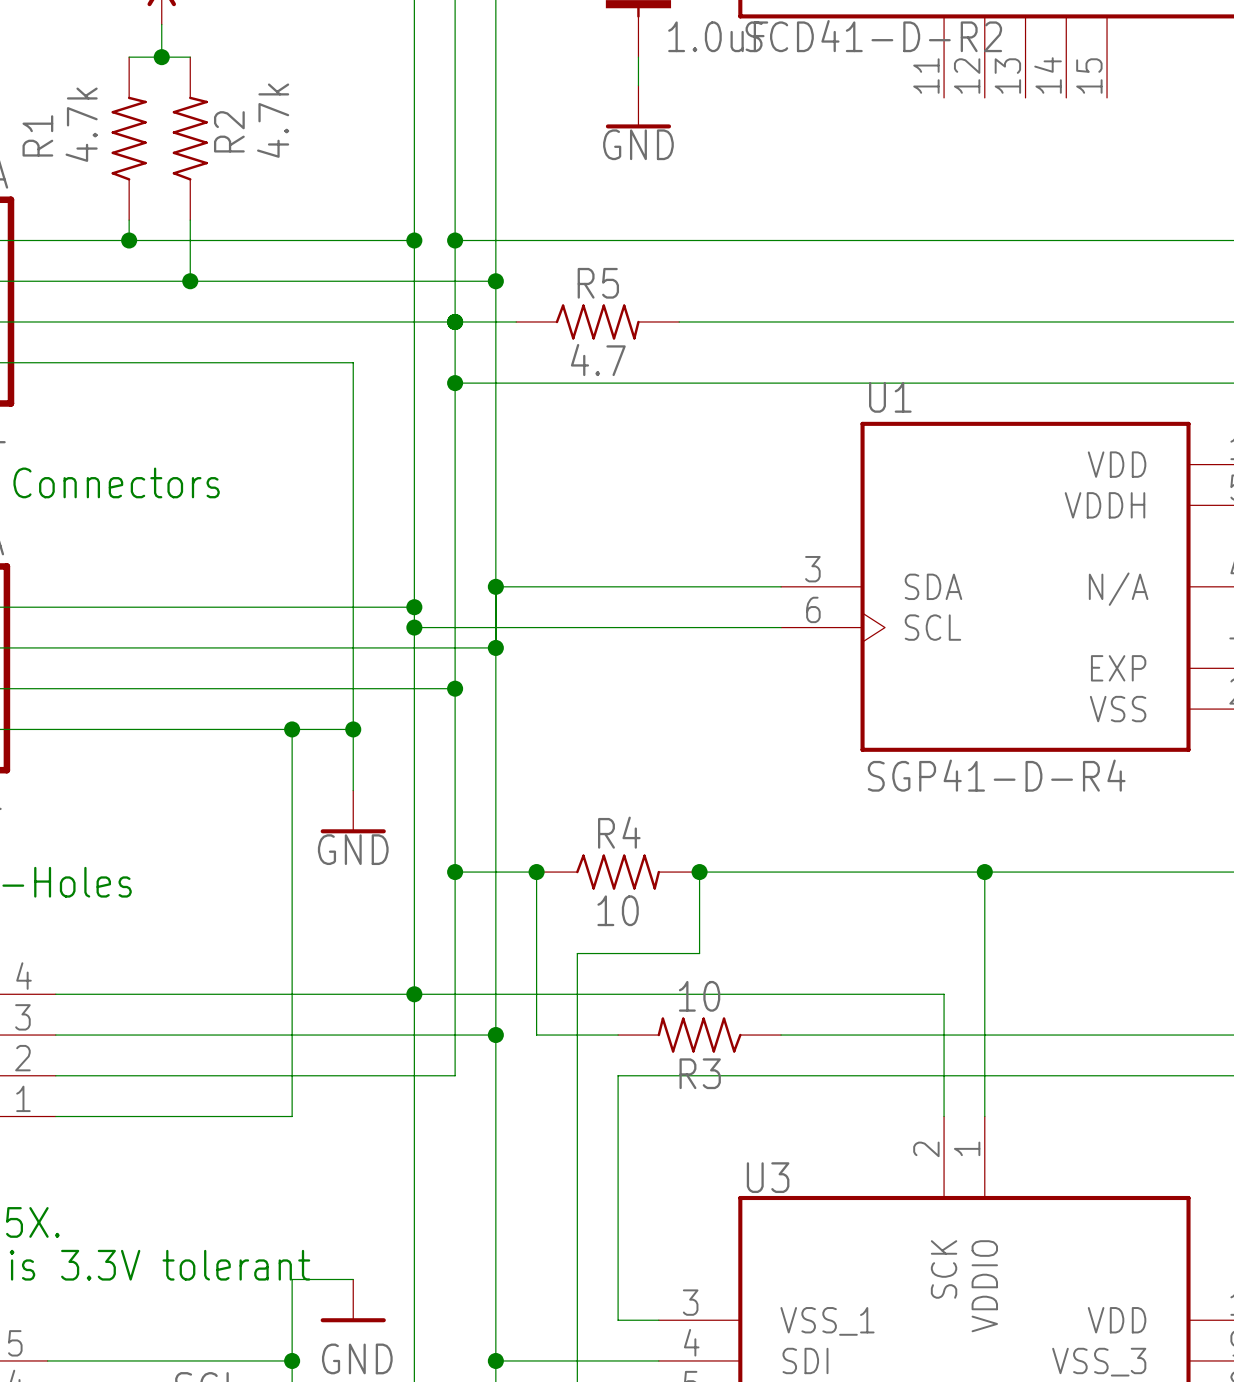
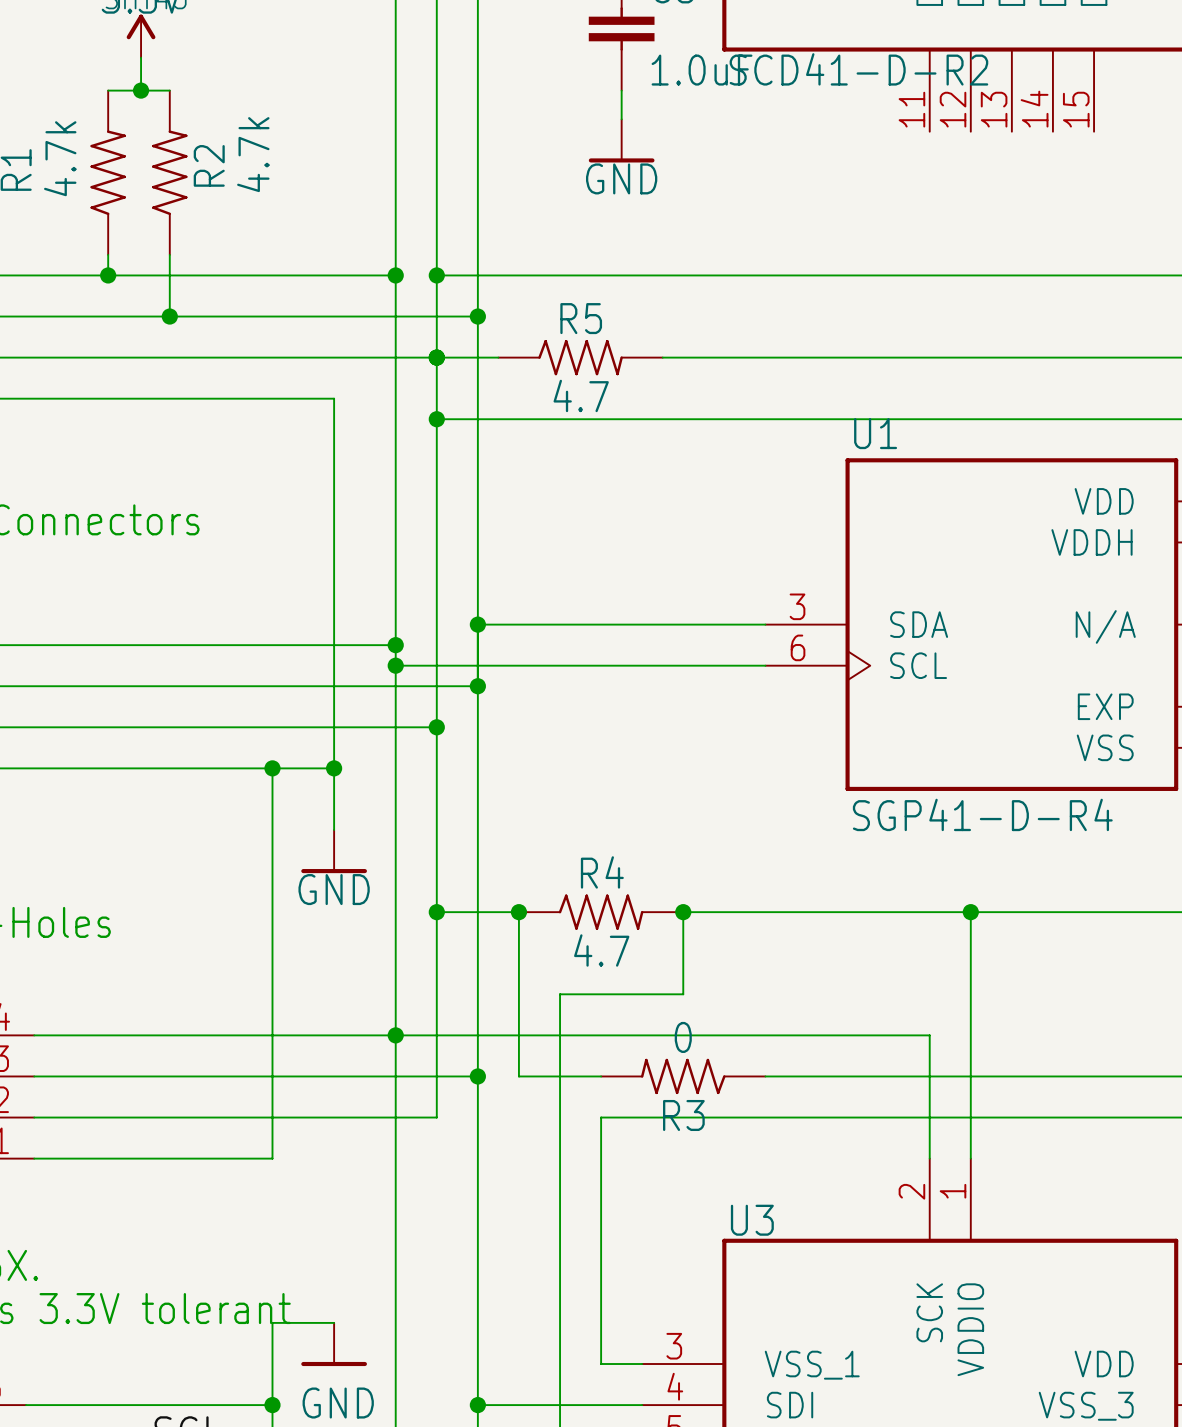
R4 value: 10 (618, 910) -> 4.7 (601, 950)
R3 value: 10 (699, 996) -> 0 (683, 1037)

